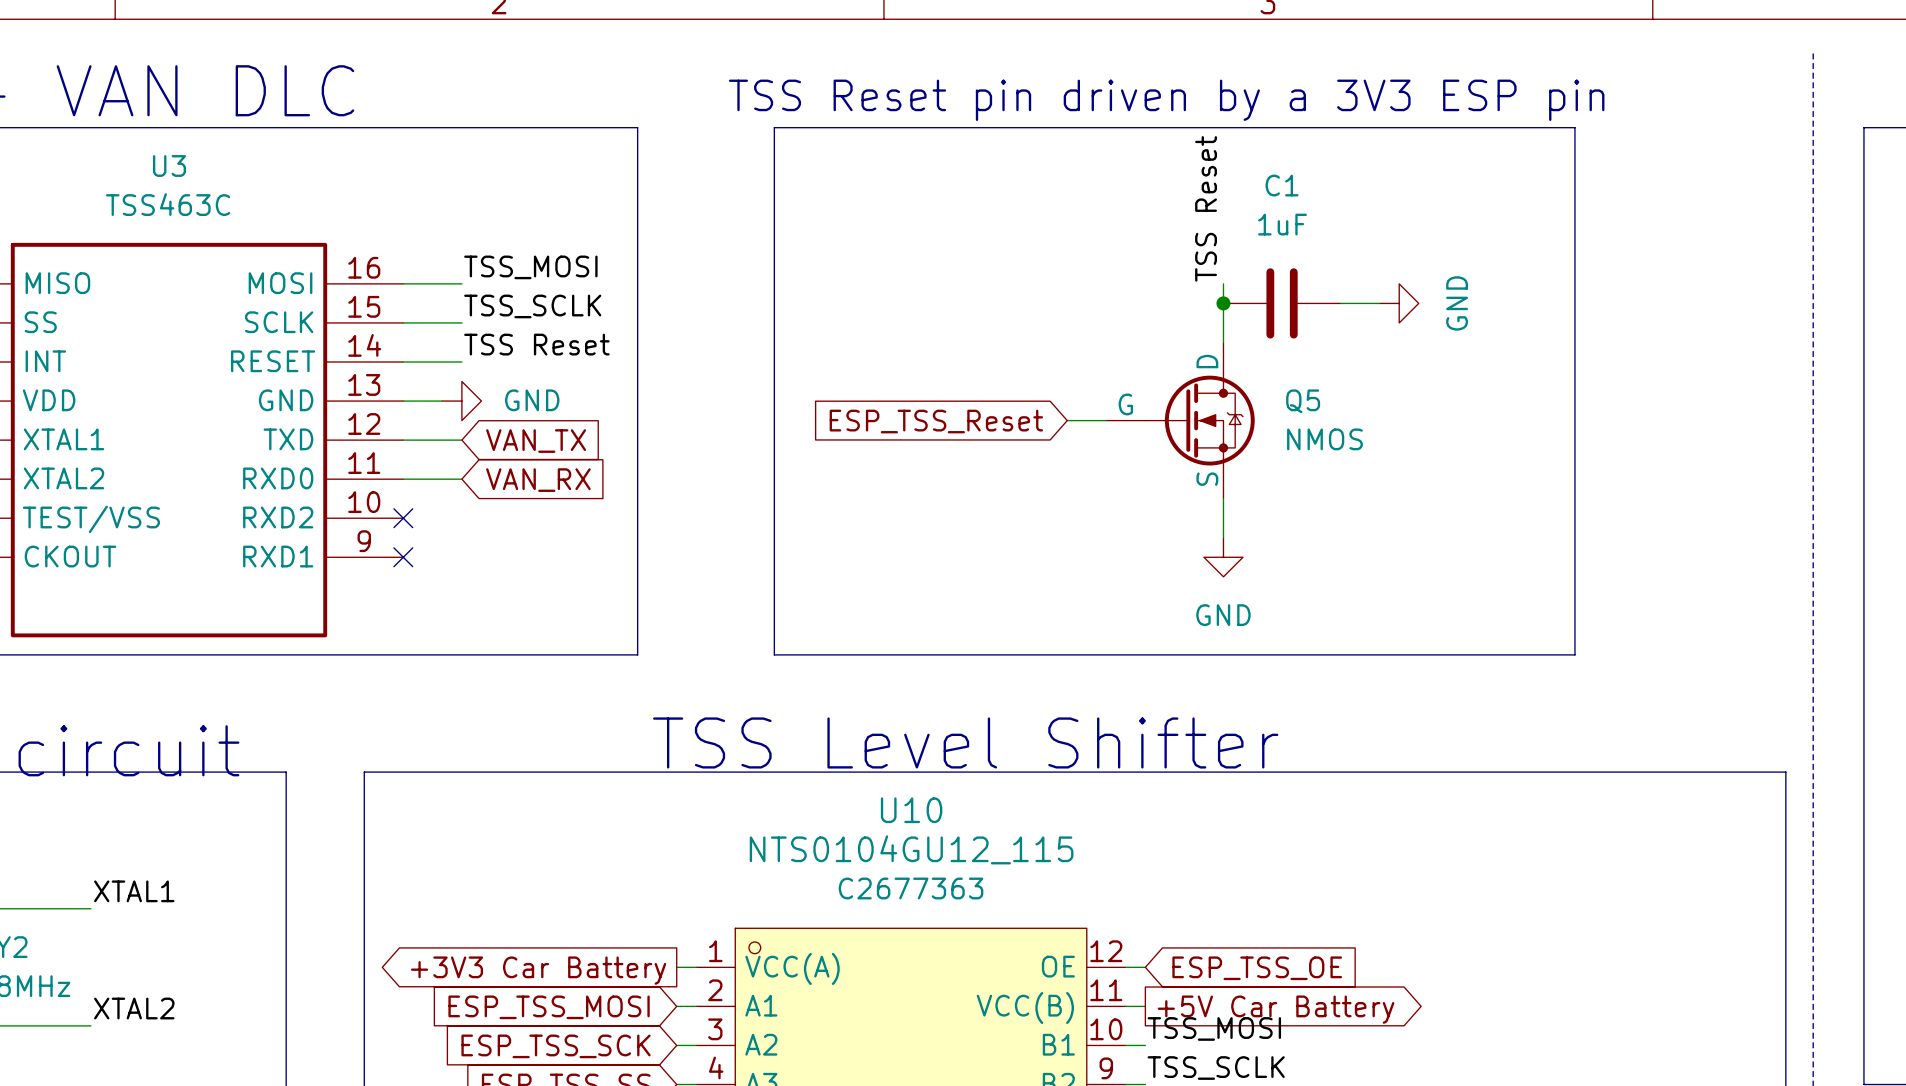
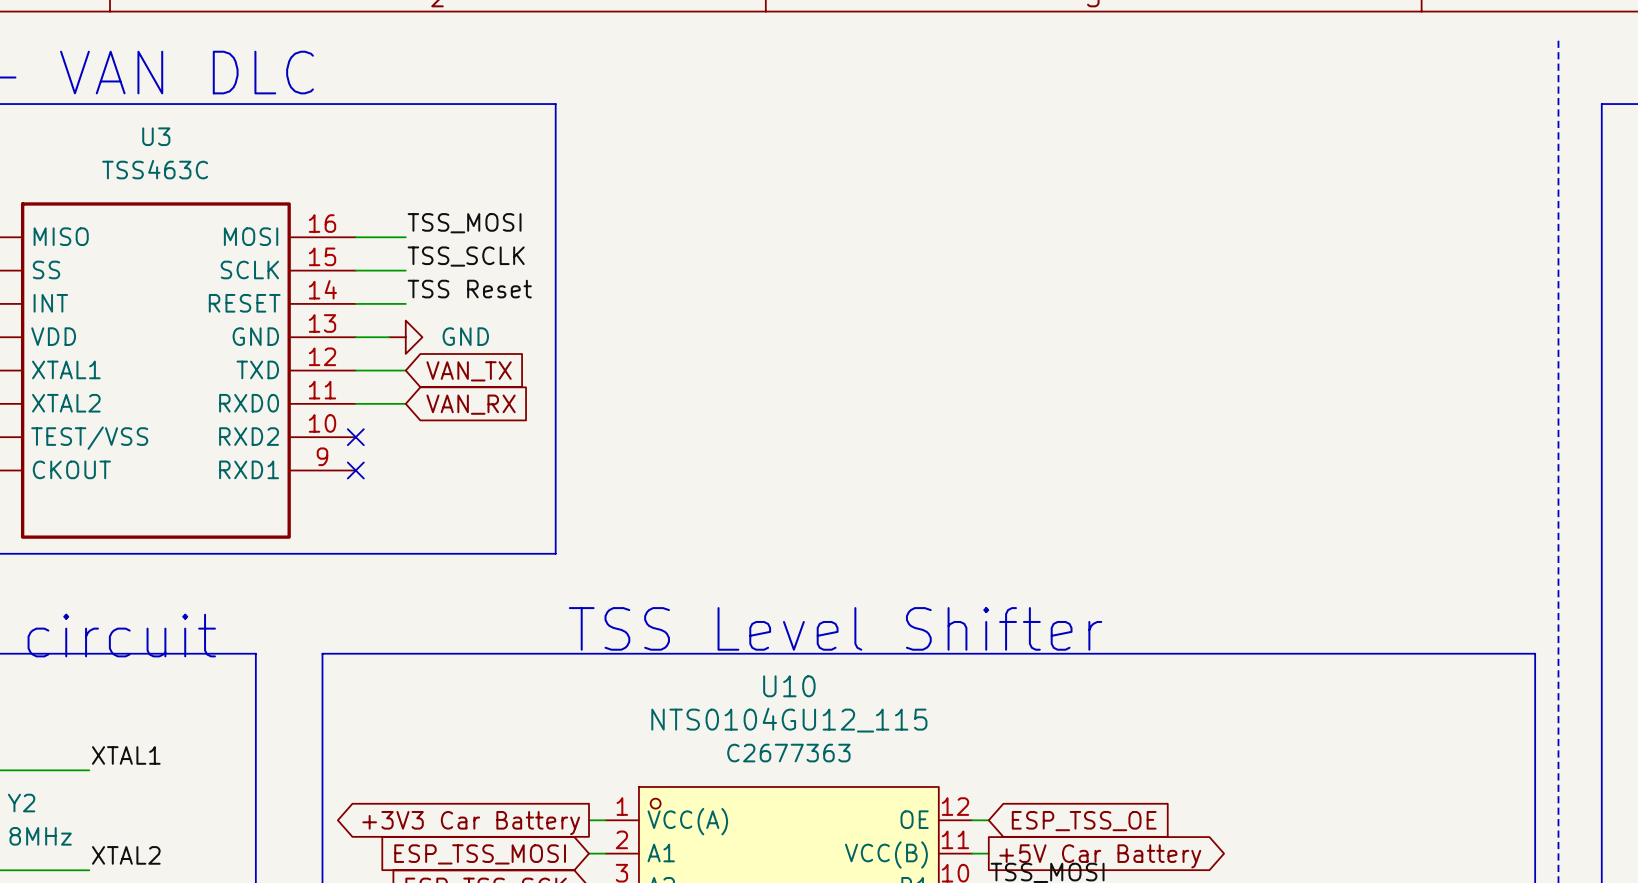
text: TSS Reset pin driven by a 3V3 ESP pin (1166, 100) -> none
line: (774, 127) (1574, 127) (1574, 654) (774, 654) (774, 127) -> none
label: TSS Reset (1206, 208) -> none
wire: (1223, 283) (1223, 342) -> none
junction: (1223, 303) -> none
C1: 1uF (1282, 303) -> none
wire: (1340, 303) (1379, 303) -> none
power symbol: GND (1399, 303) -> none
wire: (1067, 420) (1106, 420) -> none
Q5: NMOS (1180, 420) -> none
global label: ESP_TSS_Reset (936, 421) -> none
wire: (1223, 498) (1223, 537) -> none
power symbol: GND (1223, 557) -> none

